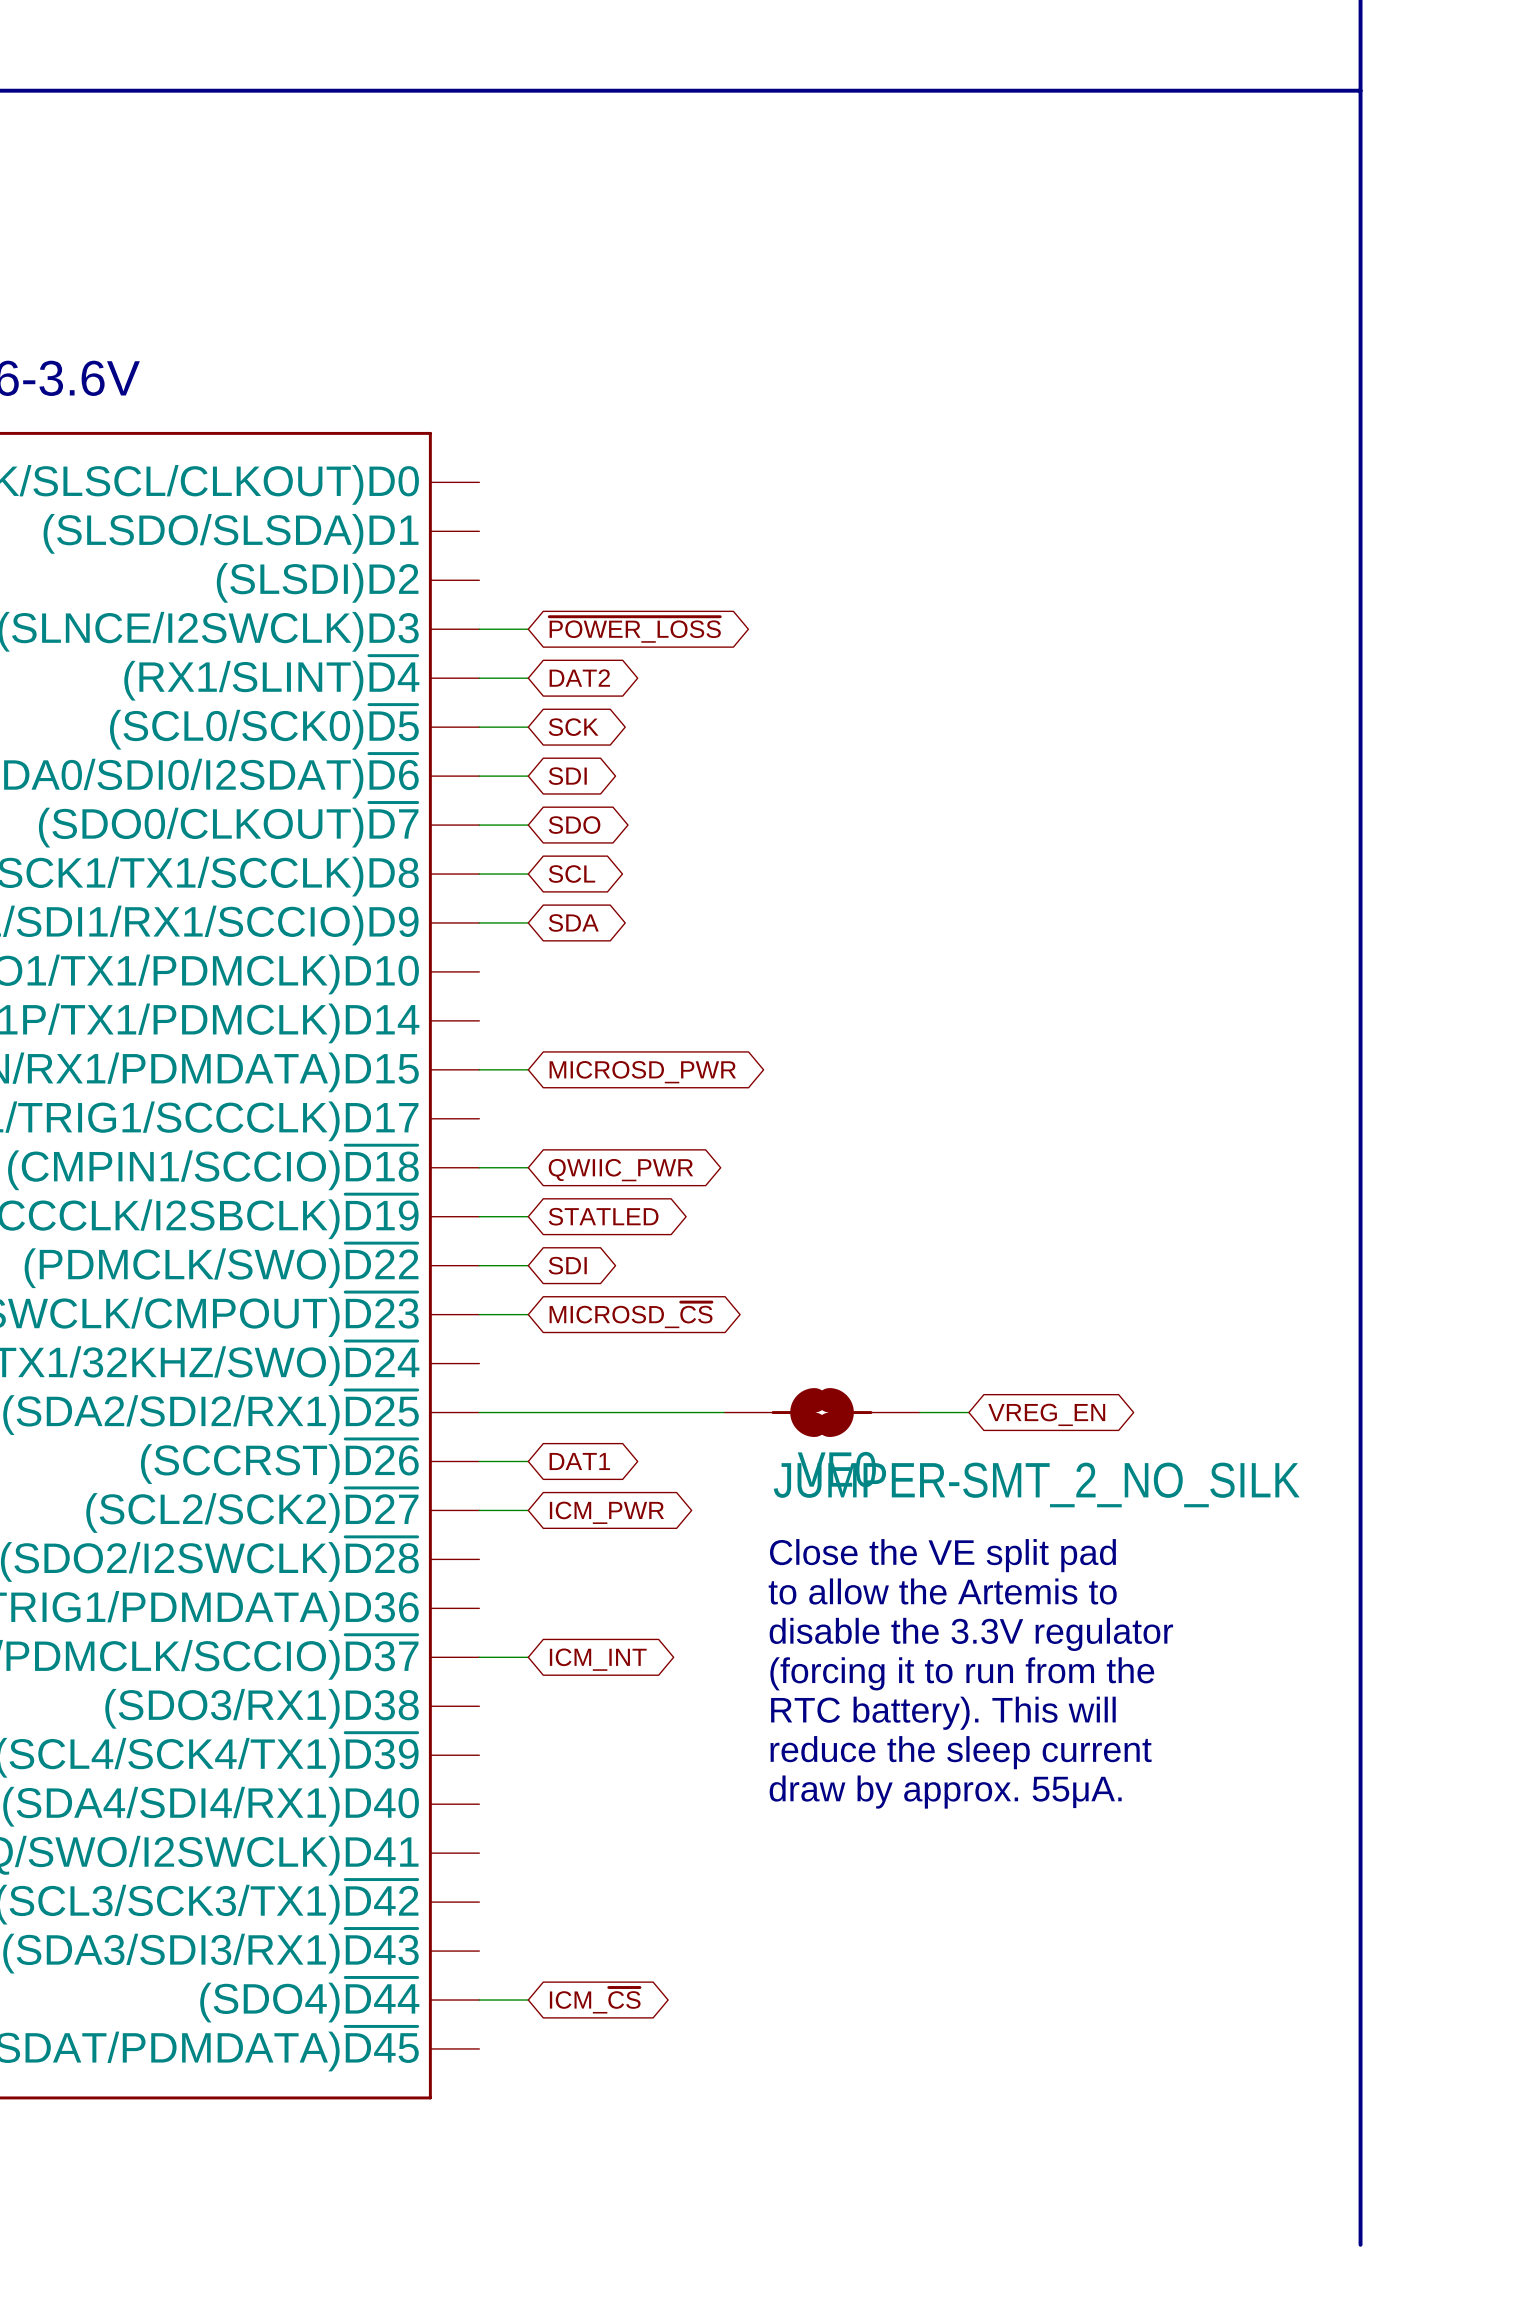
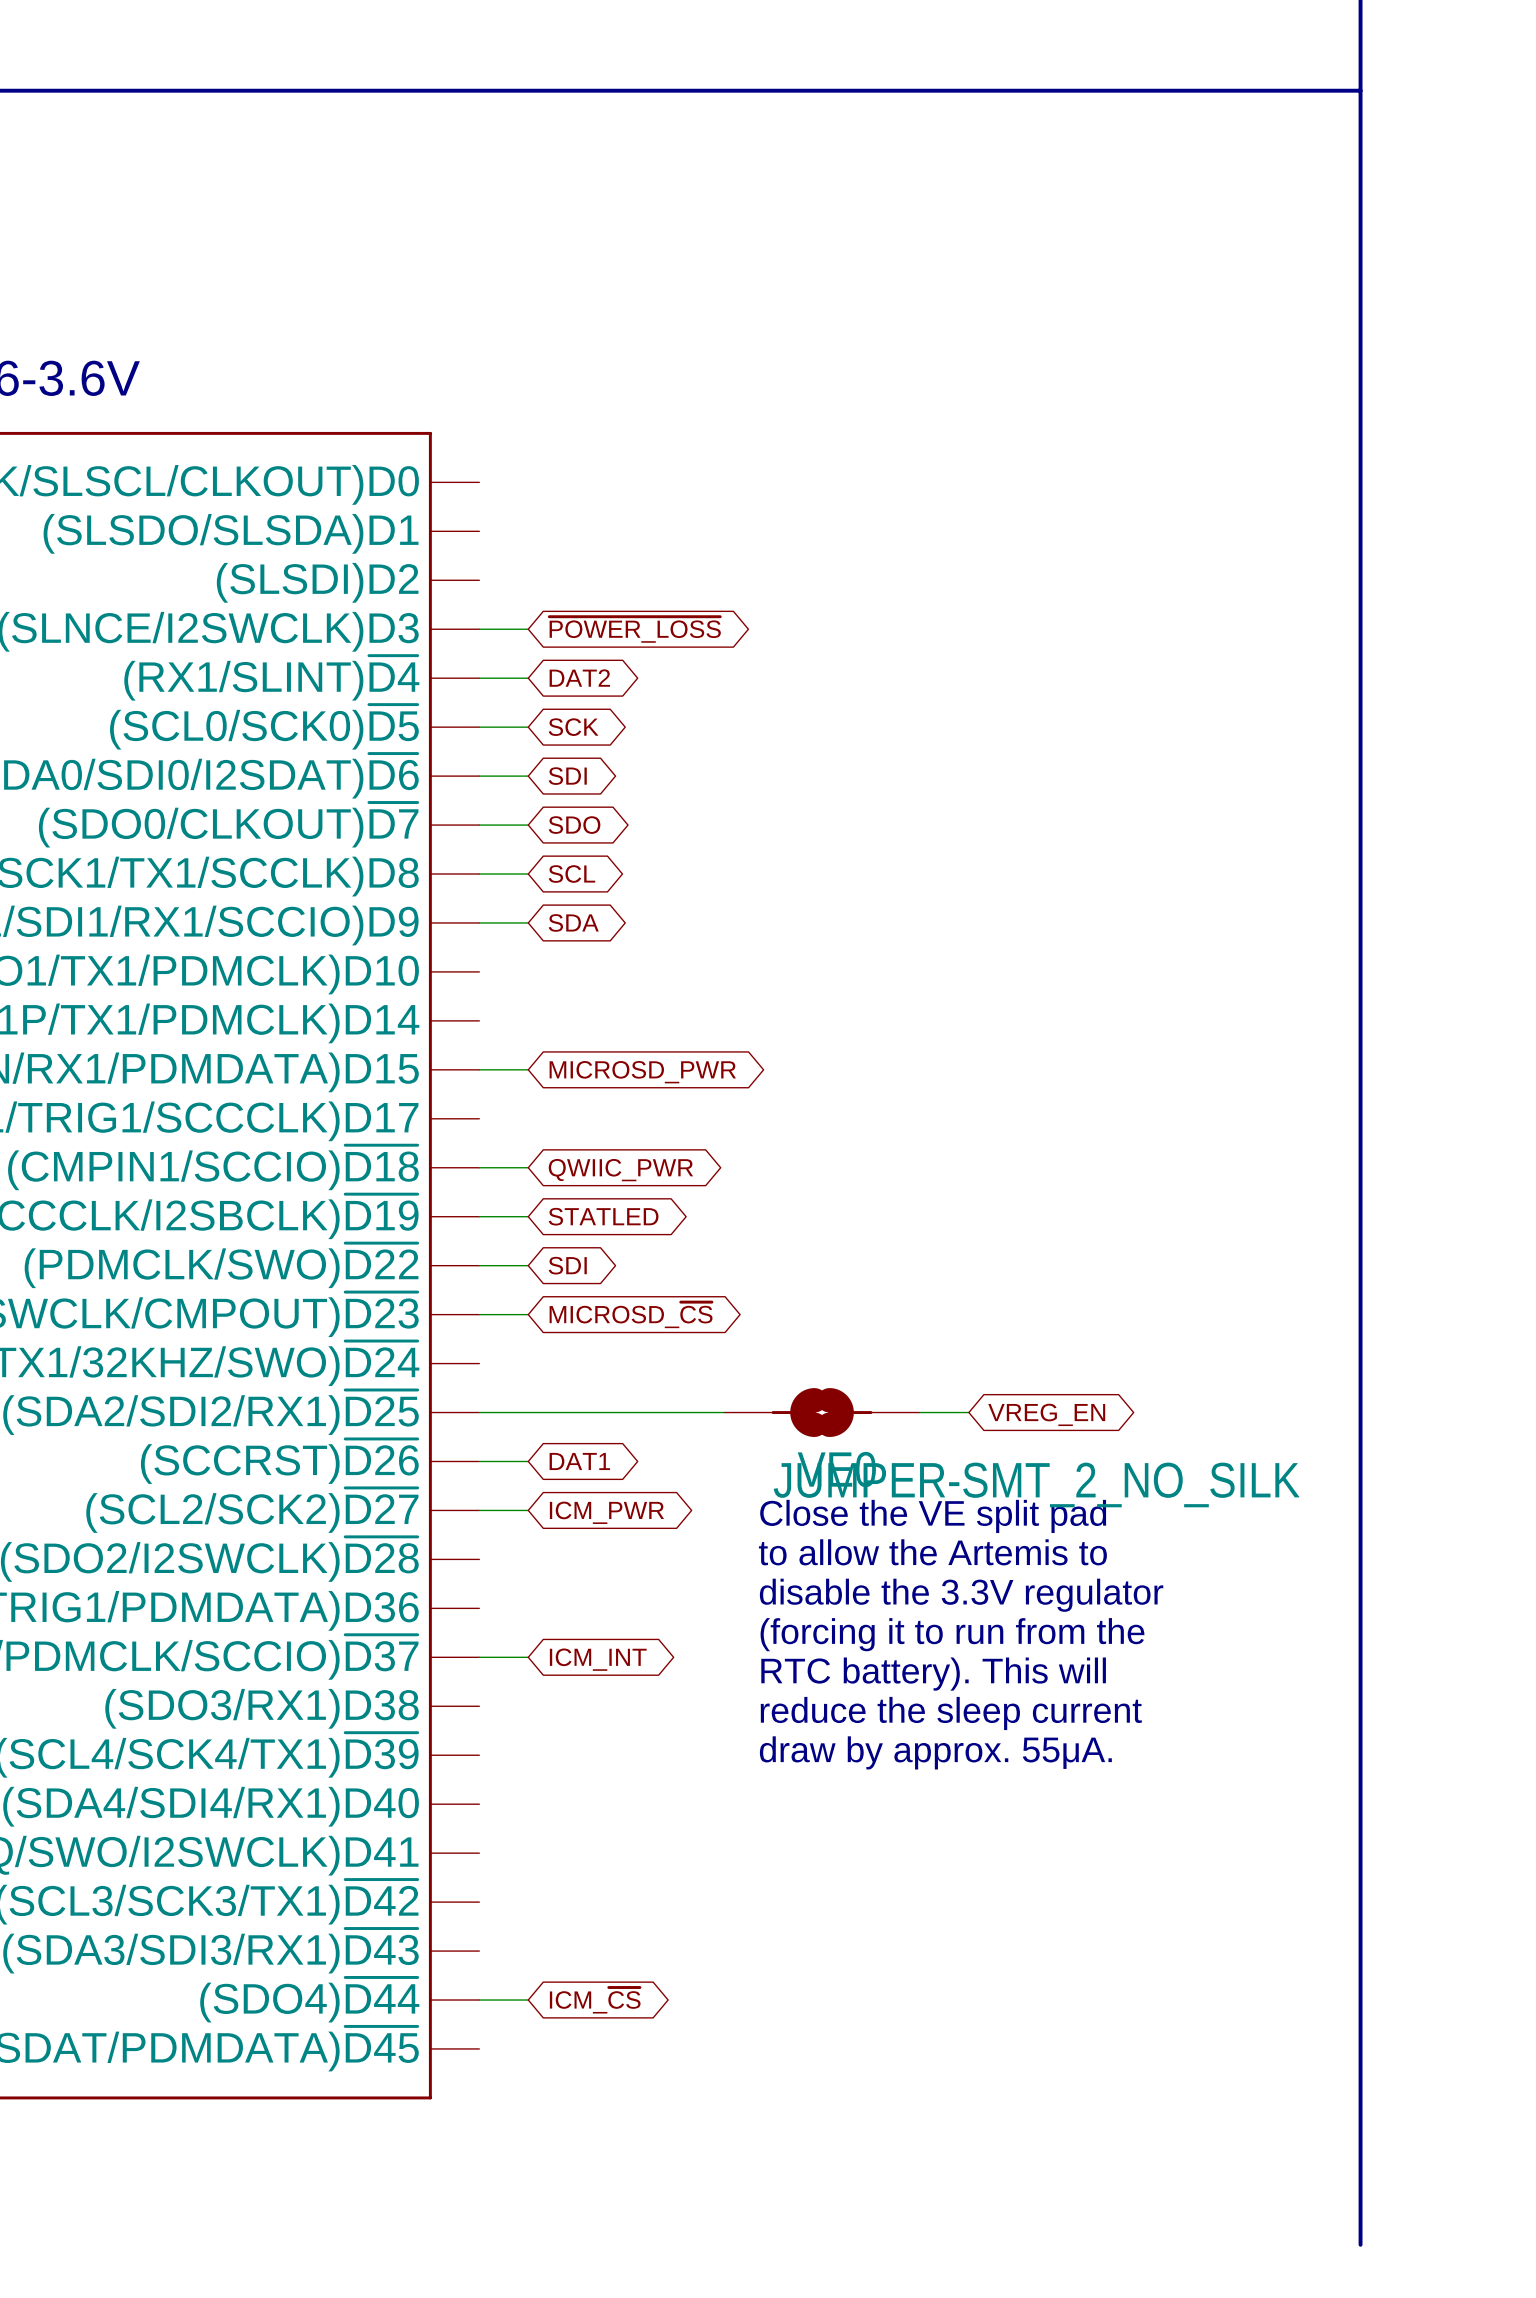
text position: Close the VE split pad (942, 1555) -> Close the VE split pad (933, 1516)
text position: to allow the Artemis to (942, 1591) -> to allow the Artemis to (932, 1552)
text position: disable the 3.3V regulator (971, 1634) -> disable the 3.3V regulator (961, 1595)
text position: (forcing it to run from the (962, 1673) -> (forcing it to run from the (952, 1634)
text position: RTC battery). This will (943, 1713) -> RTC battery). This will (933, 1674)
text position: reduce the sleep current (961, 1752) -> reduce the sleep current (951, 1713)
text position: draw by approx. 55μA. (945, 1792) -> draw by approx. 55μA. (935, 1752)

